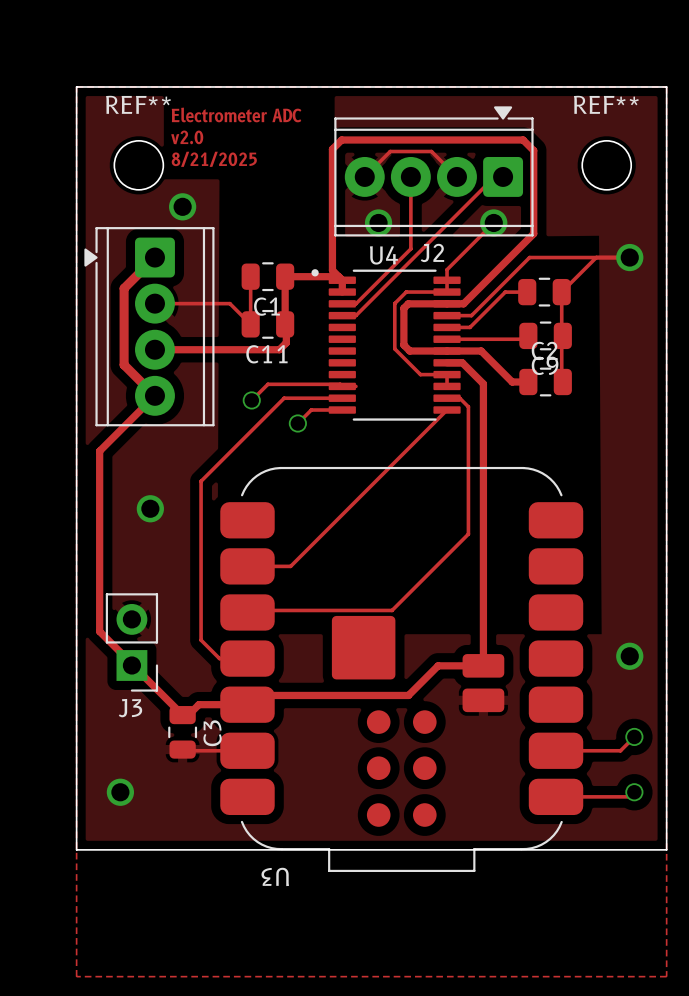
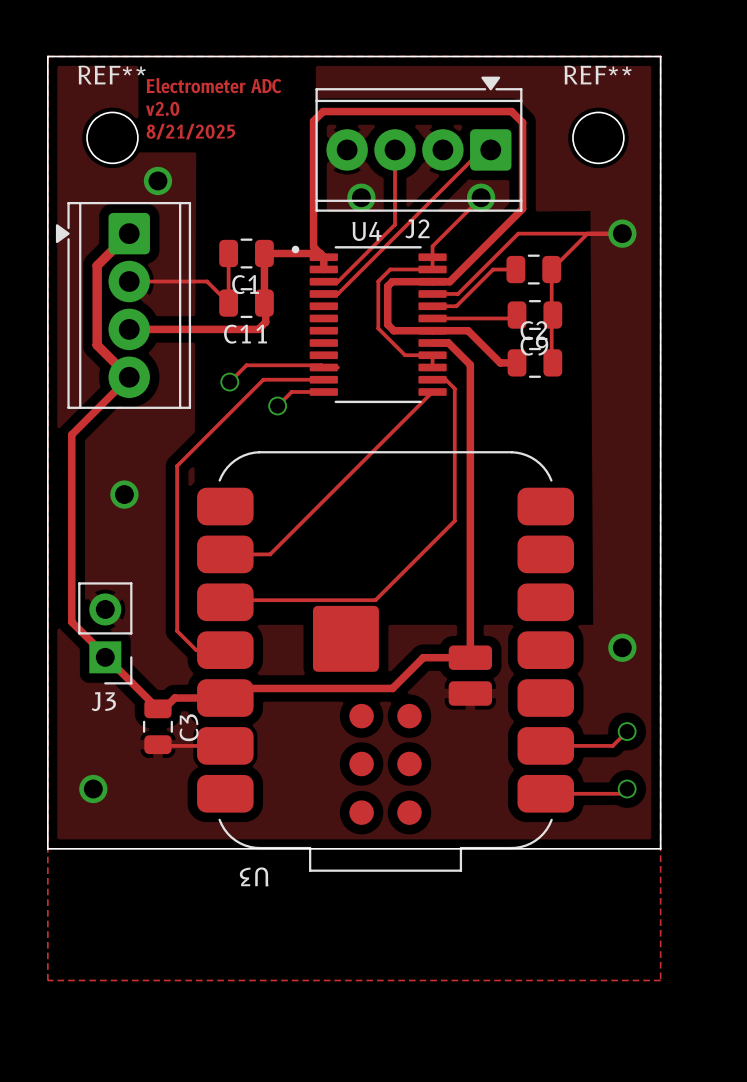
track: (364, 176) (390, 151) (431, 151) (456, 176) -> none

